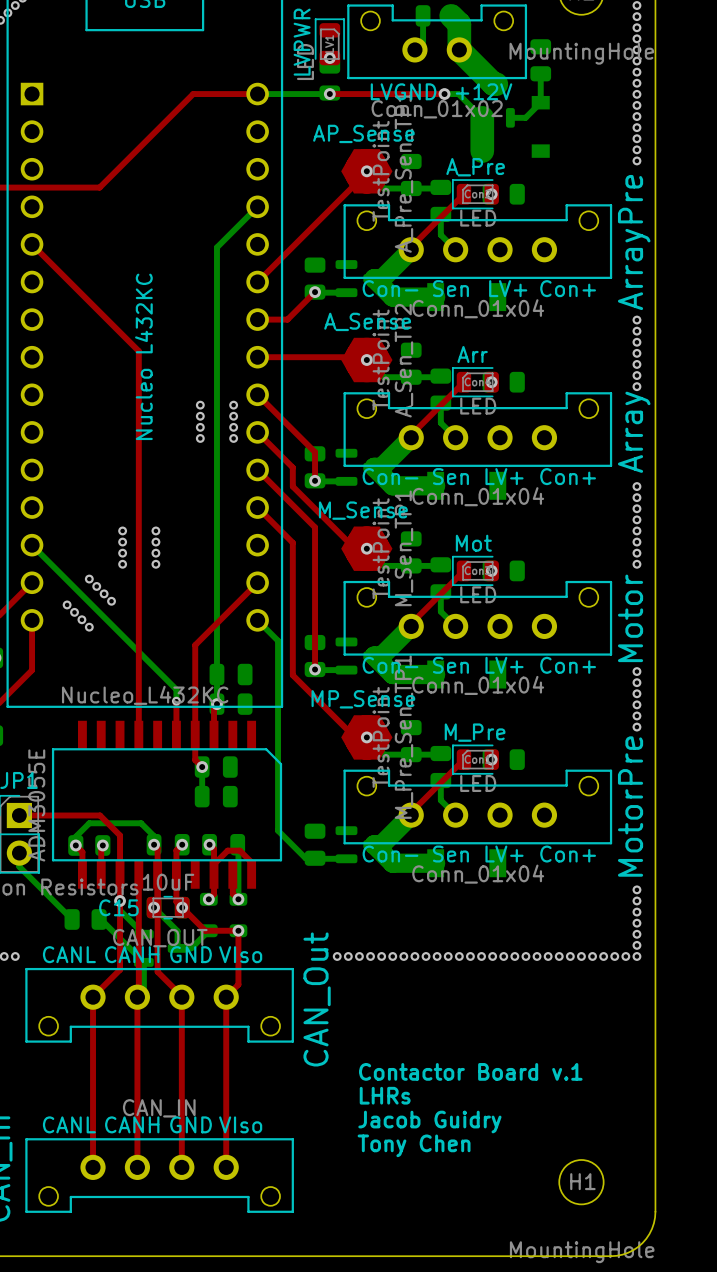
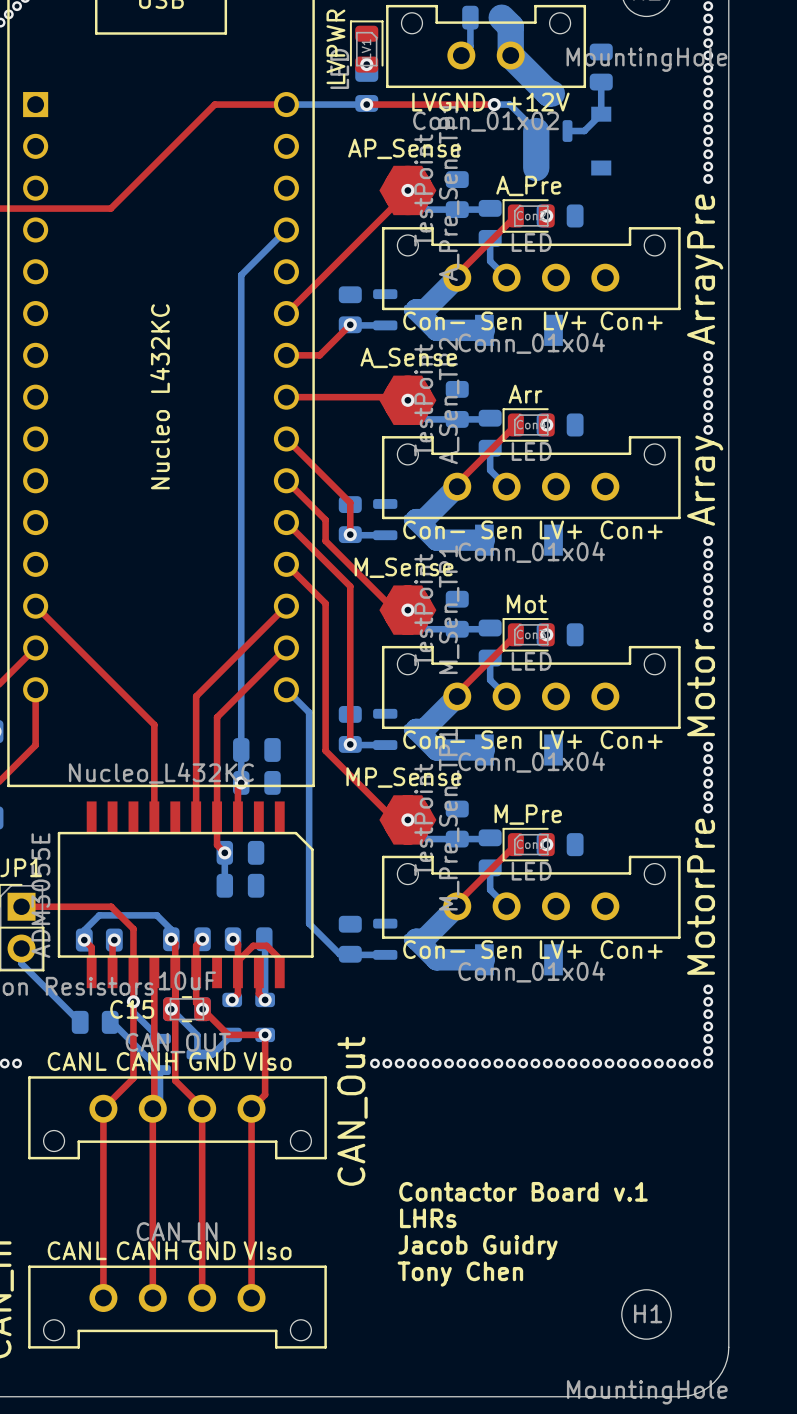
top track: (32, 244) (138, 351) (138, 651) -> (35, 606) (154, 724)
via: (200, 405) -> none
via: (233, 405) -> none
via: (200, 416) -> none
via: (233, 416) -> none
via: (200, 427) -> none
via: (233, 427) -> none
via: (200, 438) -> none
via: (233, 438) -> none
via: (122, 530) -> none
via: (155, 530) -> none
via: (122, 542) -> none
via: (155, 542) -> none
bottom track: (32, 545) (176, 689) (176, 701) -> none
top track: none -> (286, 606) (196, 696) (196, 779)
via: (122, 553) -> none
via: (155, 553) -> none
via: (122, 564) -> none
via: (155, 564) -> none
via: (89, 579) -> none
via: (96, 586) -> none
via: (104, 593) -> none
via: (111, 601) -> none
via: (67, 604) -> none
via: (74, 612) -> none
via: (81, 619) -> none
via: (89, 627) -> none
via: (176, 701) -> none

